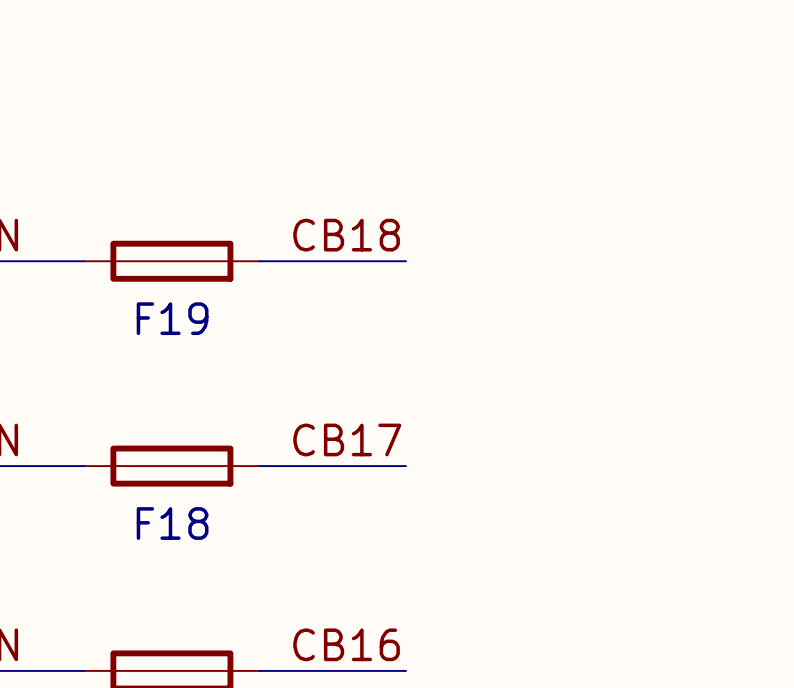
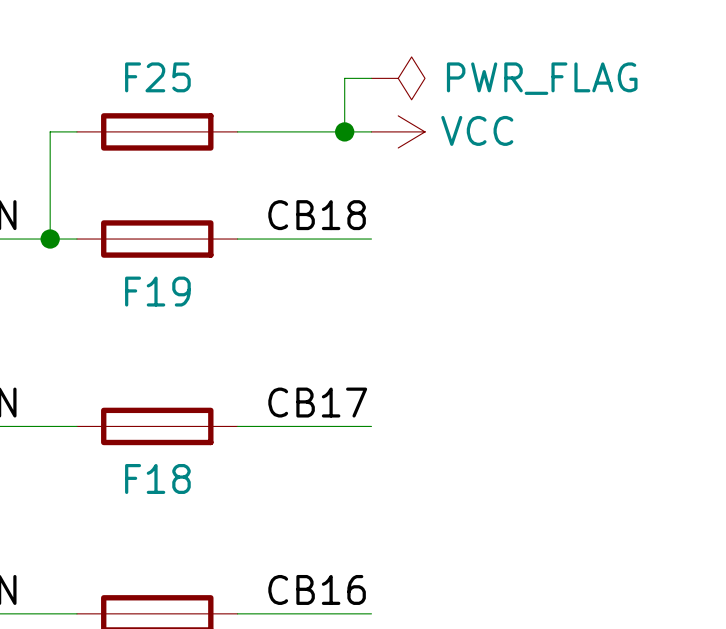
wire: none -> (371, 78) (344, 78) (344, 131)
power symbol: none -> PWR_FLAG (398, 78)
wire: none -> (76, 131) (50, 131) (50, 239)
F25: none -> (157, 131)
wire: none -> (237, 131) (371, 131)
junction: none -> (344, 131)
power symbol: none -> VCC (398, 131)
junction: none -> (50, 239)

